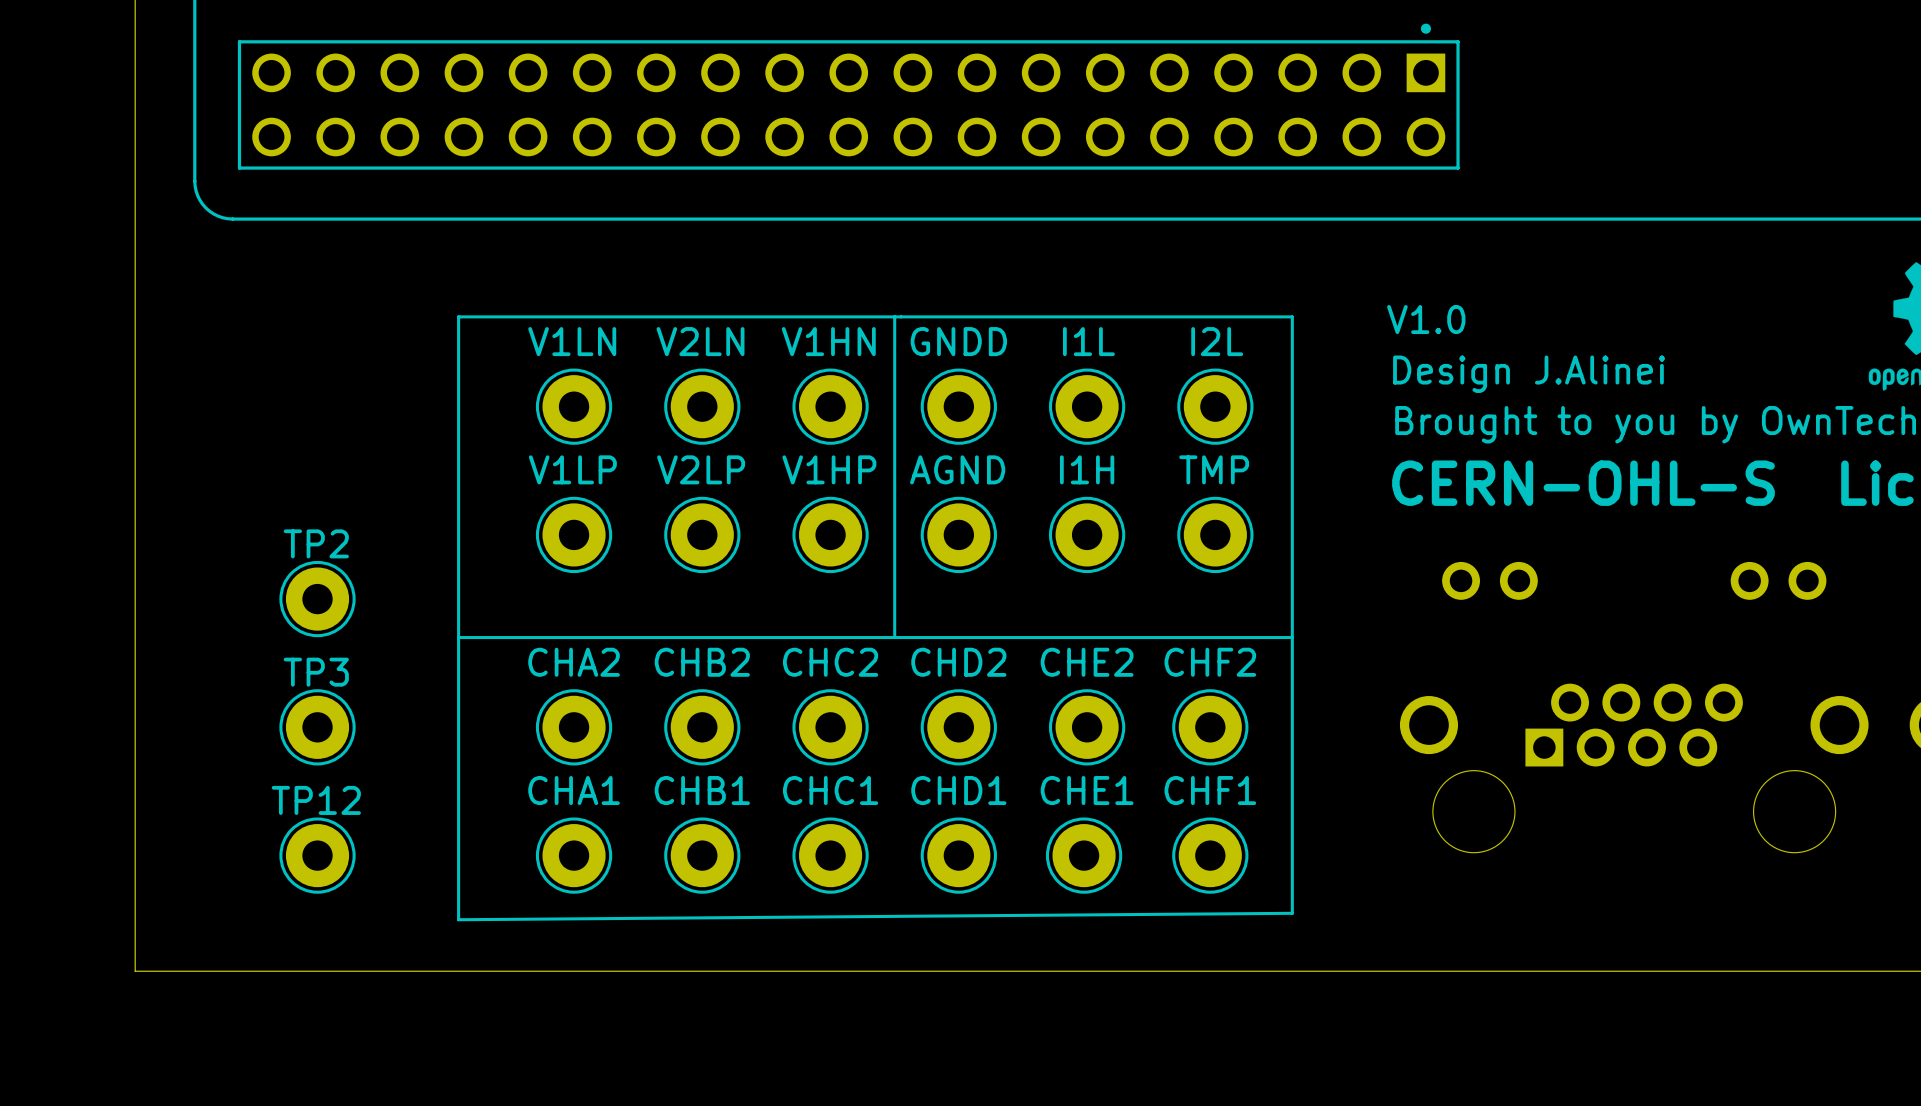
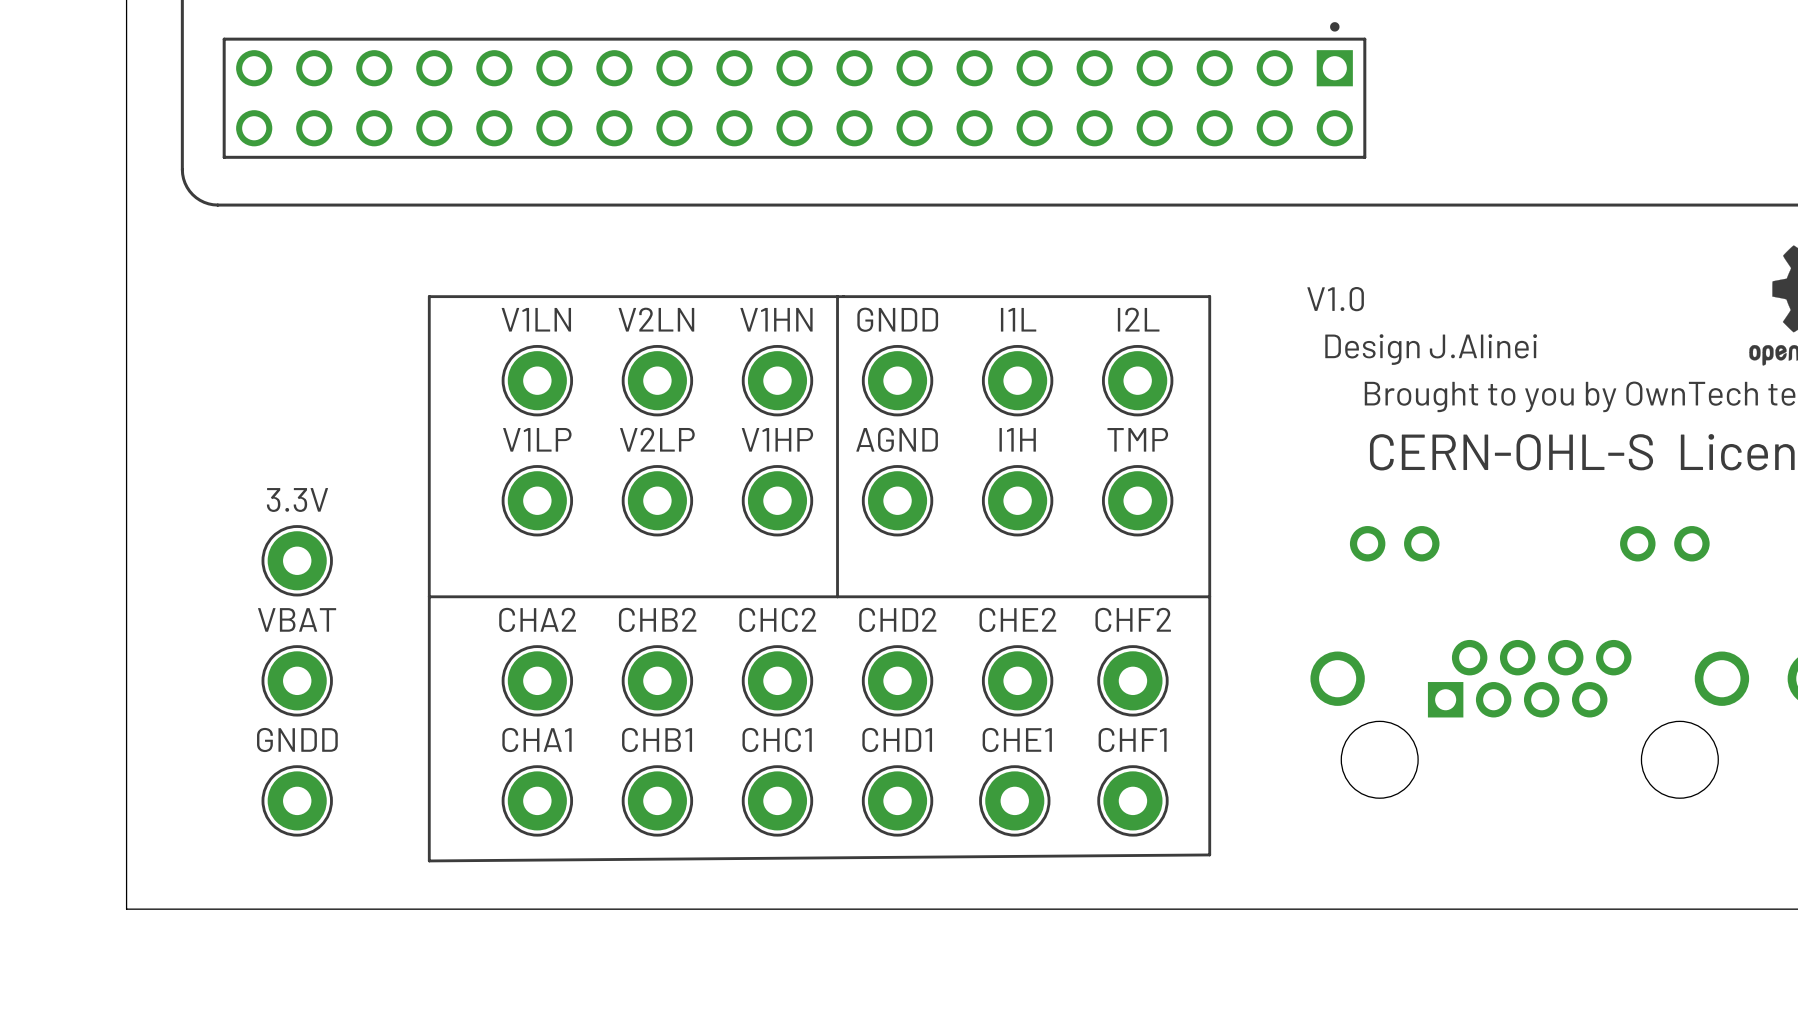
text: none -> 3.3V (297, 499)
TP2 name: TP2 (316, 543) -> none
text: none -> VBAT (297, 619)
TP3 name: TP3 (316, 672) -> none
text: none -> GNDD (297, 739)
TP12 name: TP12 (316, 800) -> none

